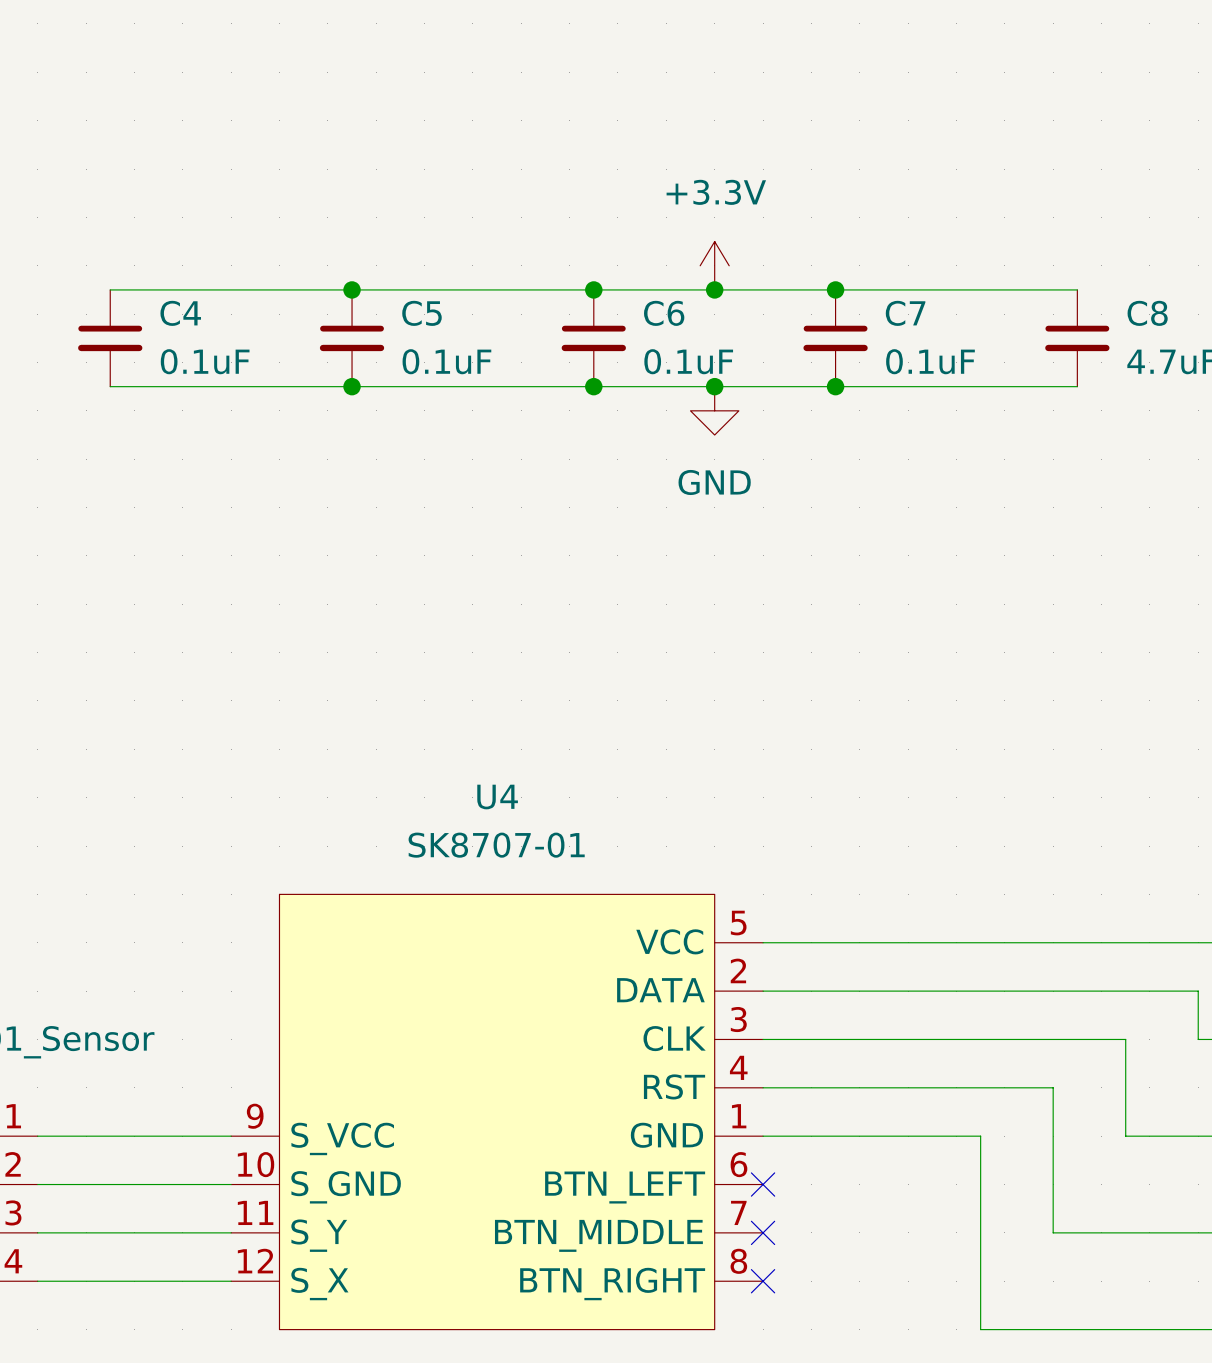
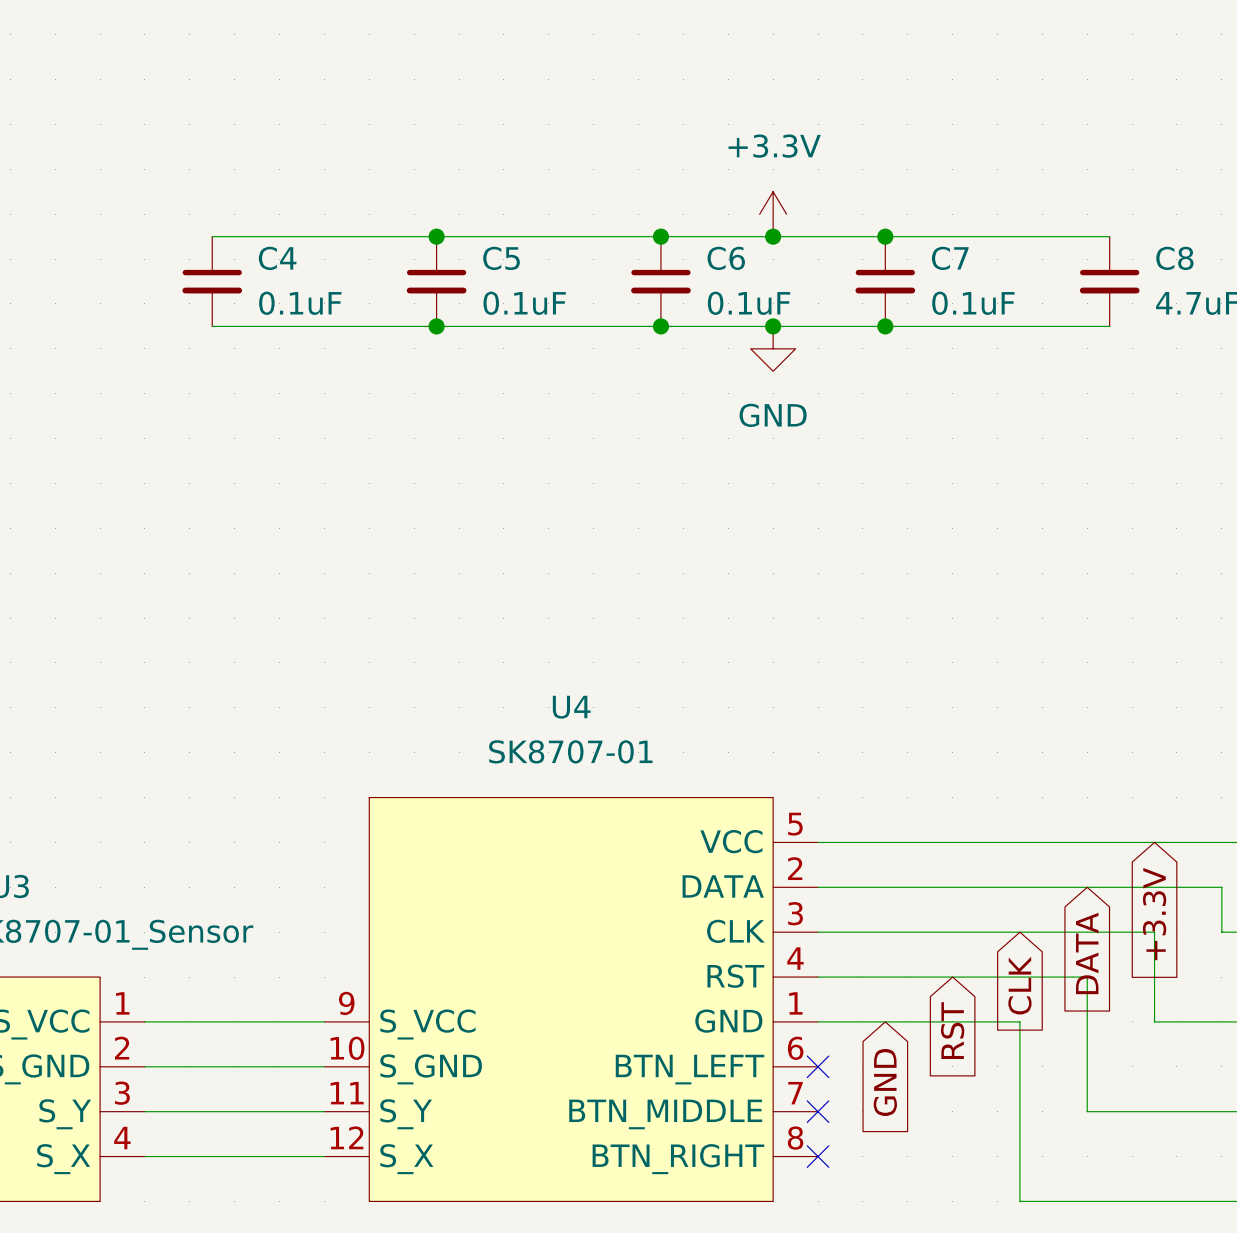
global label: none -> +3.3V (1154, 914)
global label: none -> DATA (1087, 953)
global label: none -> CLK (1019, 985)
global label: none -> RST (952, 1030)
global label: none -> GND (885, 1082)

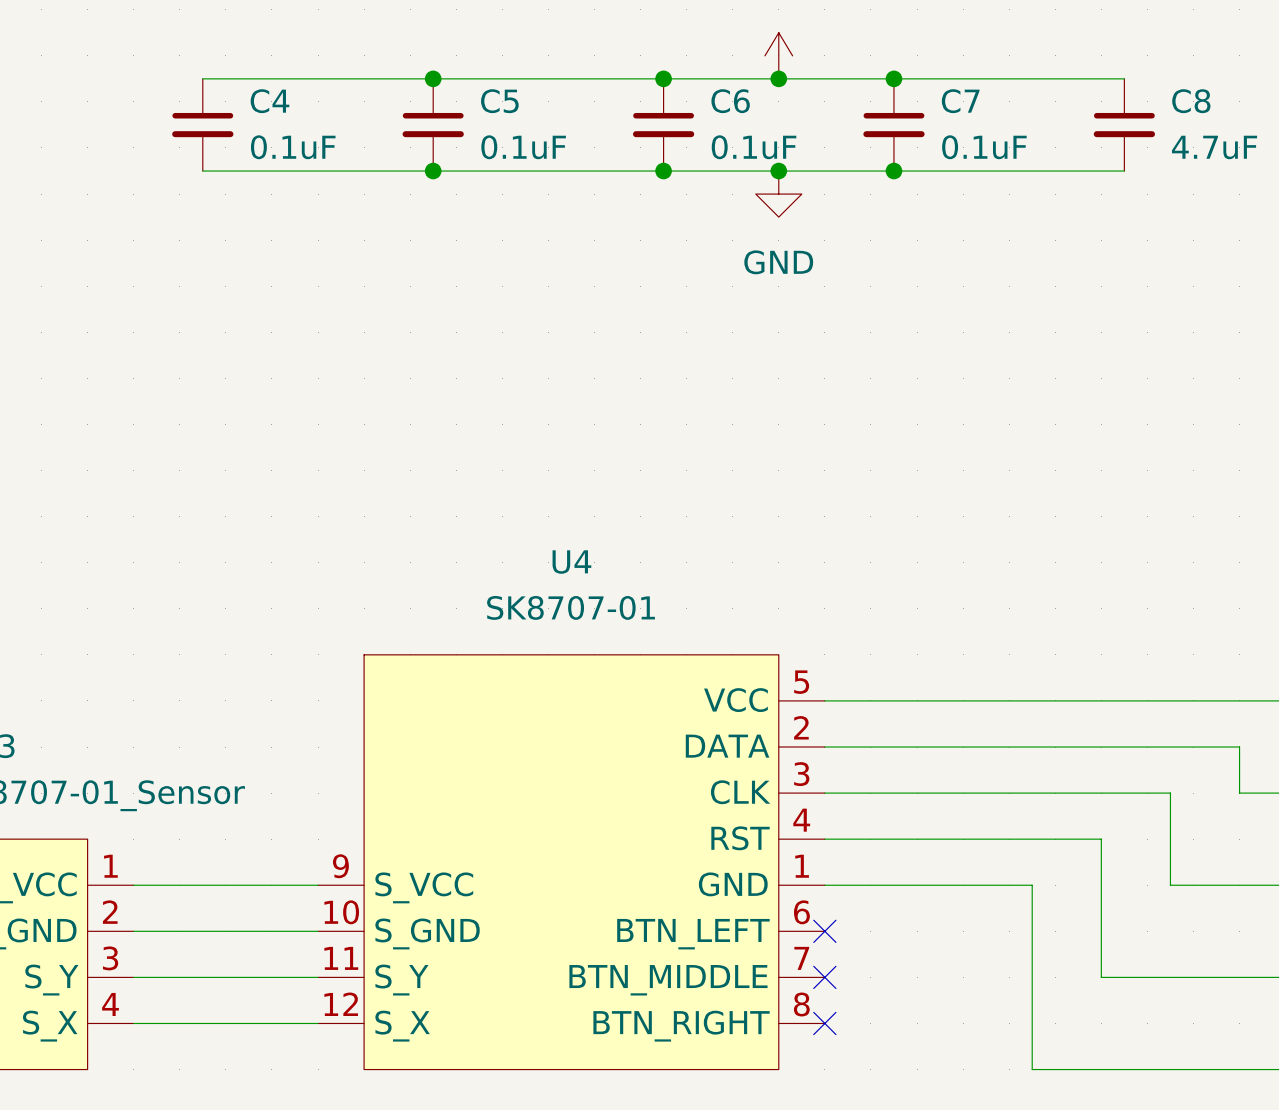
global label: +3.3V (1154, 914) -> none
global label: DATA (1087, 953) -> none
global label: CLK (1019, 985) -> none
global label: RST (952, 1030) -> none
global label: GND (885, 1082) -> none

